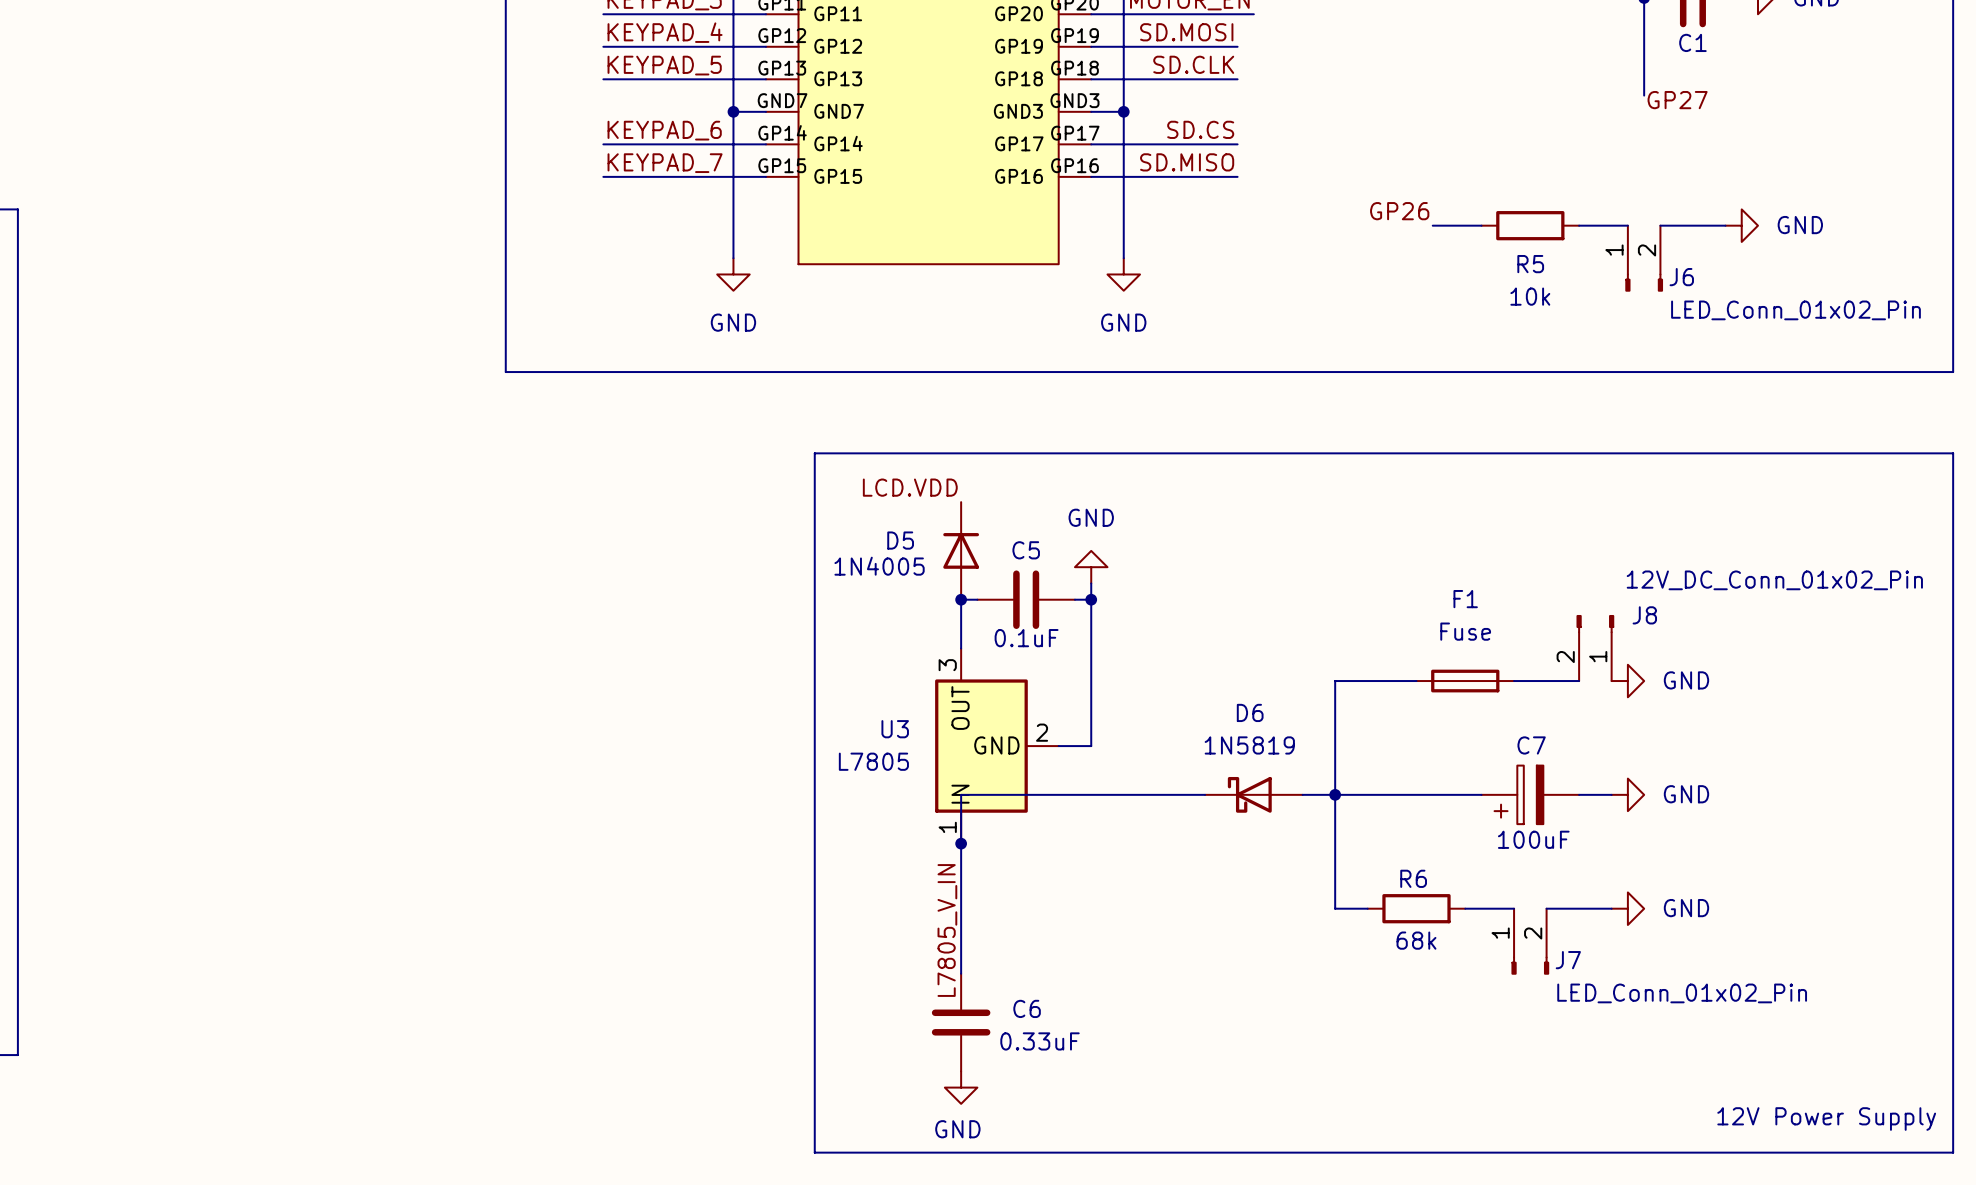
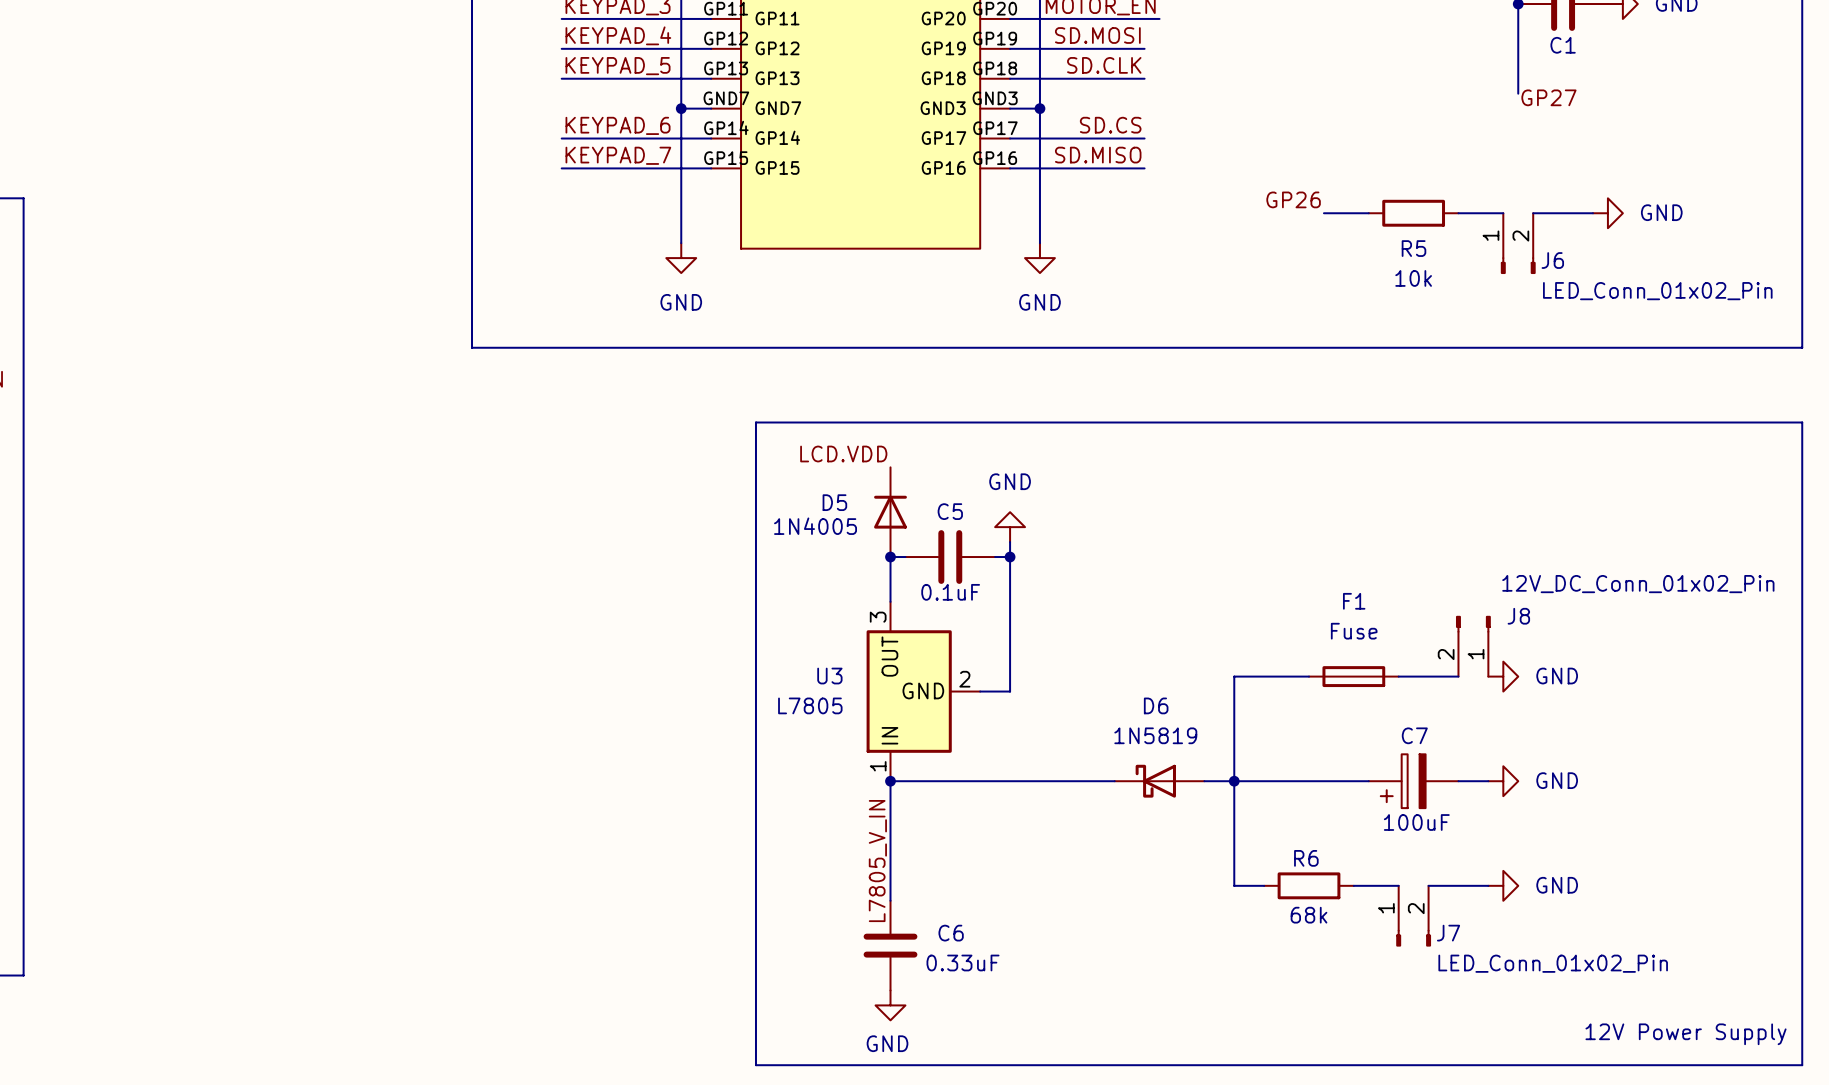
J8 position: (1595, 648) -> (1473, 646)
wire: (1416, 681) (1335, 681) (1335, 729) -> (1309, 676) (1234, 676)
F1 position: (1465, 681) -> (1353, 676)
wire: (1514, 681) (1579, 681) -> (1398, 676) (1458, 676)
power symbol: GND (1627, 681) -> none
power symbol: none -> GND (1503, 676)
wire: (1205, 794) (961, 794) (961, 843) -> (1114, 781) (890, 781)
D6 position: (1253, 794) -> (1159, 781)
wire: (1302, 794) (1481, 794) -> (1204, 781) (1368, 781)
junction position: (1335, 794) -> (1234, 781)
C7 position: (1530, 794) -> (1413, 781)
wire: (1579, 794) (1611, 794) -> (1458, 781) (1488, 781)
power symbol: GND (1627, 794) -> none
power symbol: none -> GND (1503, 781)
wire: (1335, 908) (1367, 908) -> (1234, 841) (1234, 885) (1264, 885)
R6 position: (1416, 908) -> (1309, 885)
wire: (1465, 908) (1514, 908) -> (1353, 885) (1398, 885)
wire: (1546, 908) (1611, 908) -> (1428, 885) (1488, 885)
power symbol: GND (1627, 908) -> none
J7 position: (1530, 941) -> (1413, 916)
power symbol: none -> GND (1503, 885)

